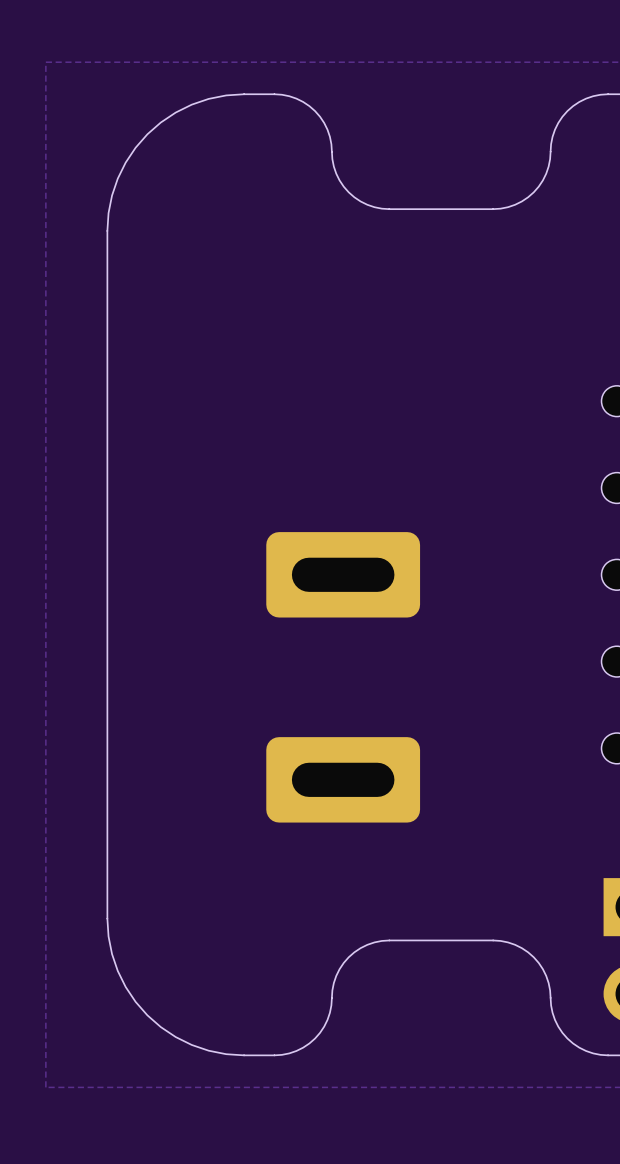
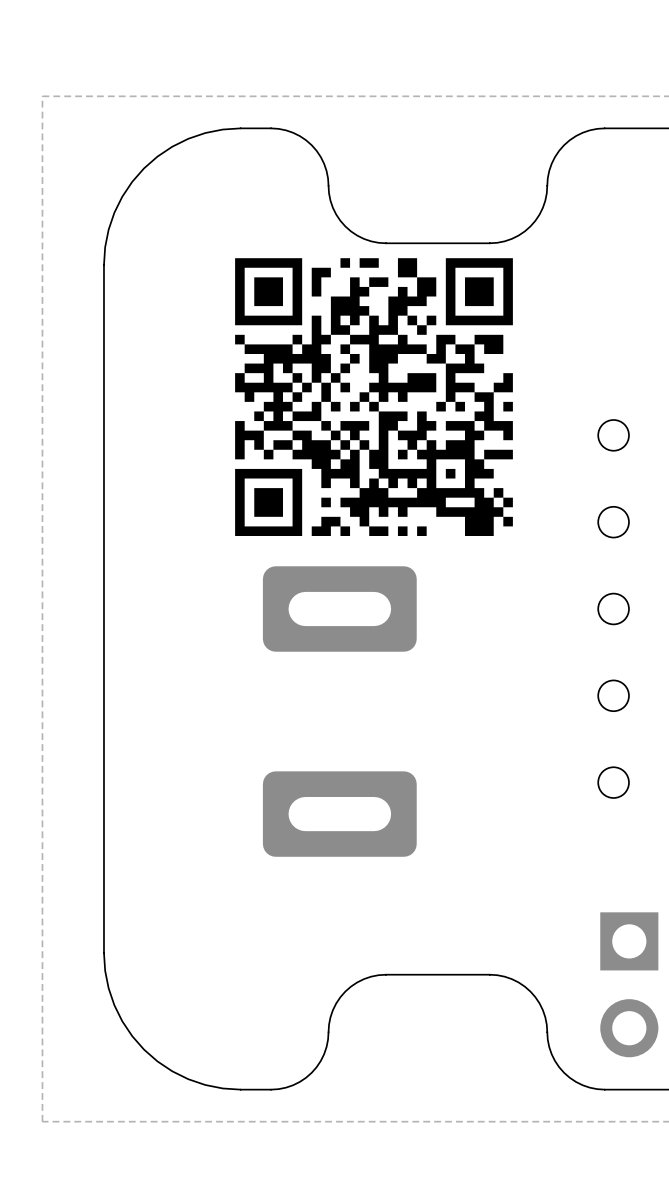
drawing: none -> [235, 258, 513, 536]

